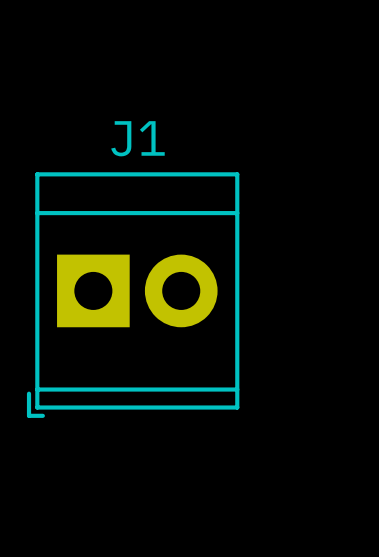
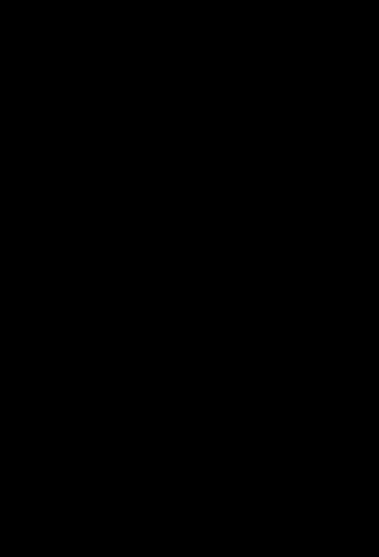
J1: (133, 295) -> none

